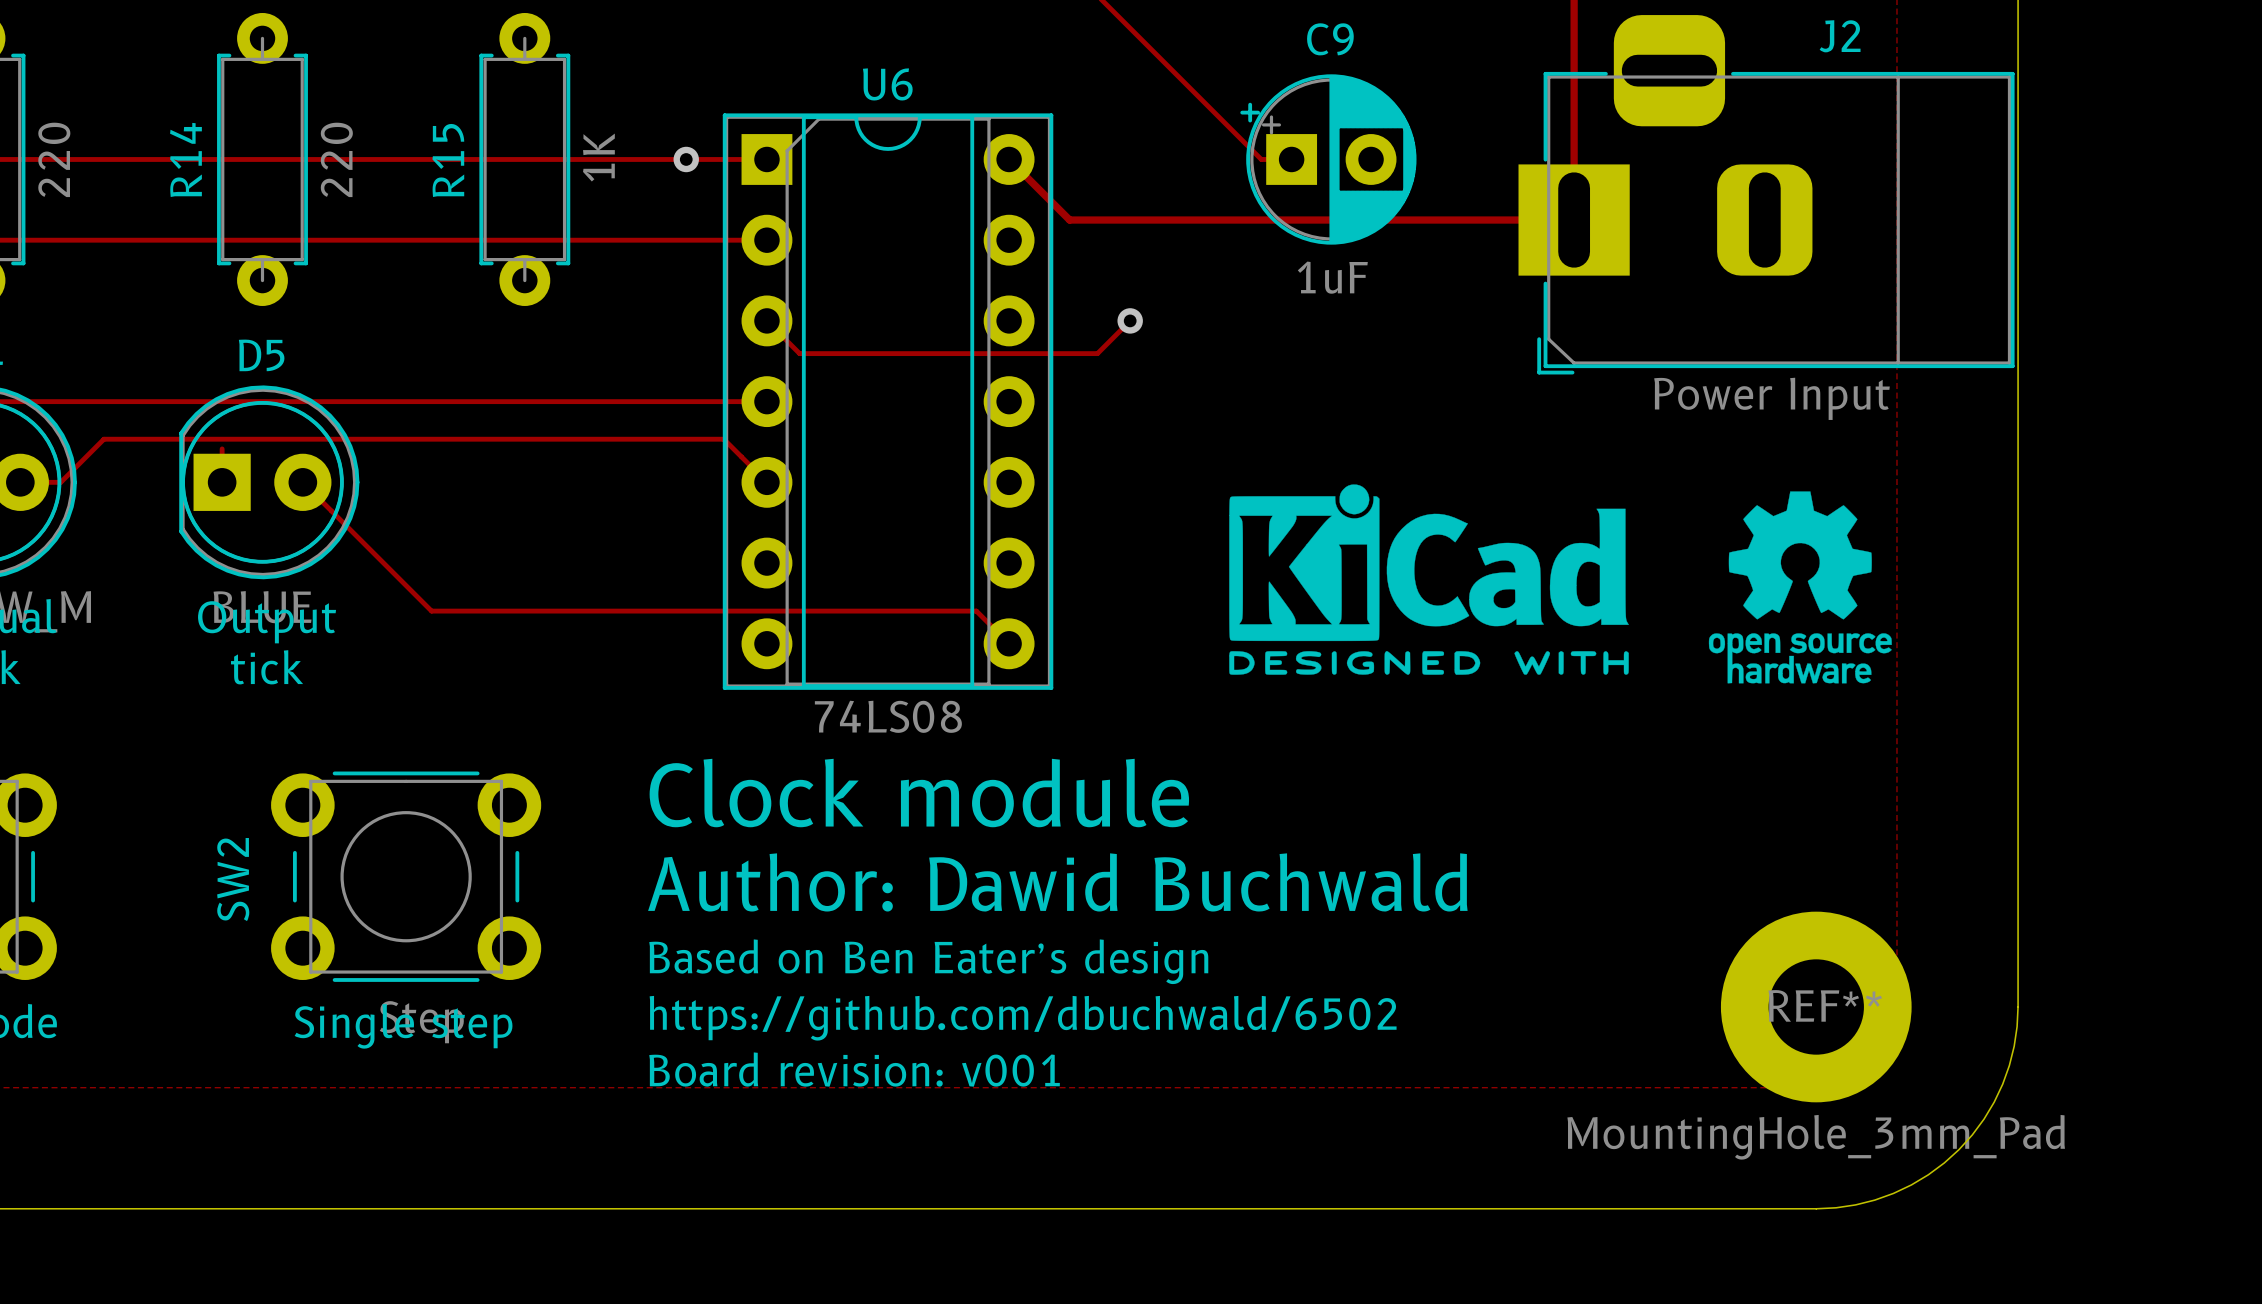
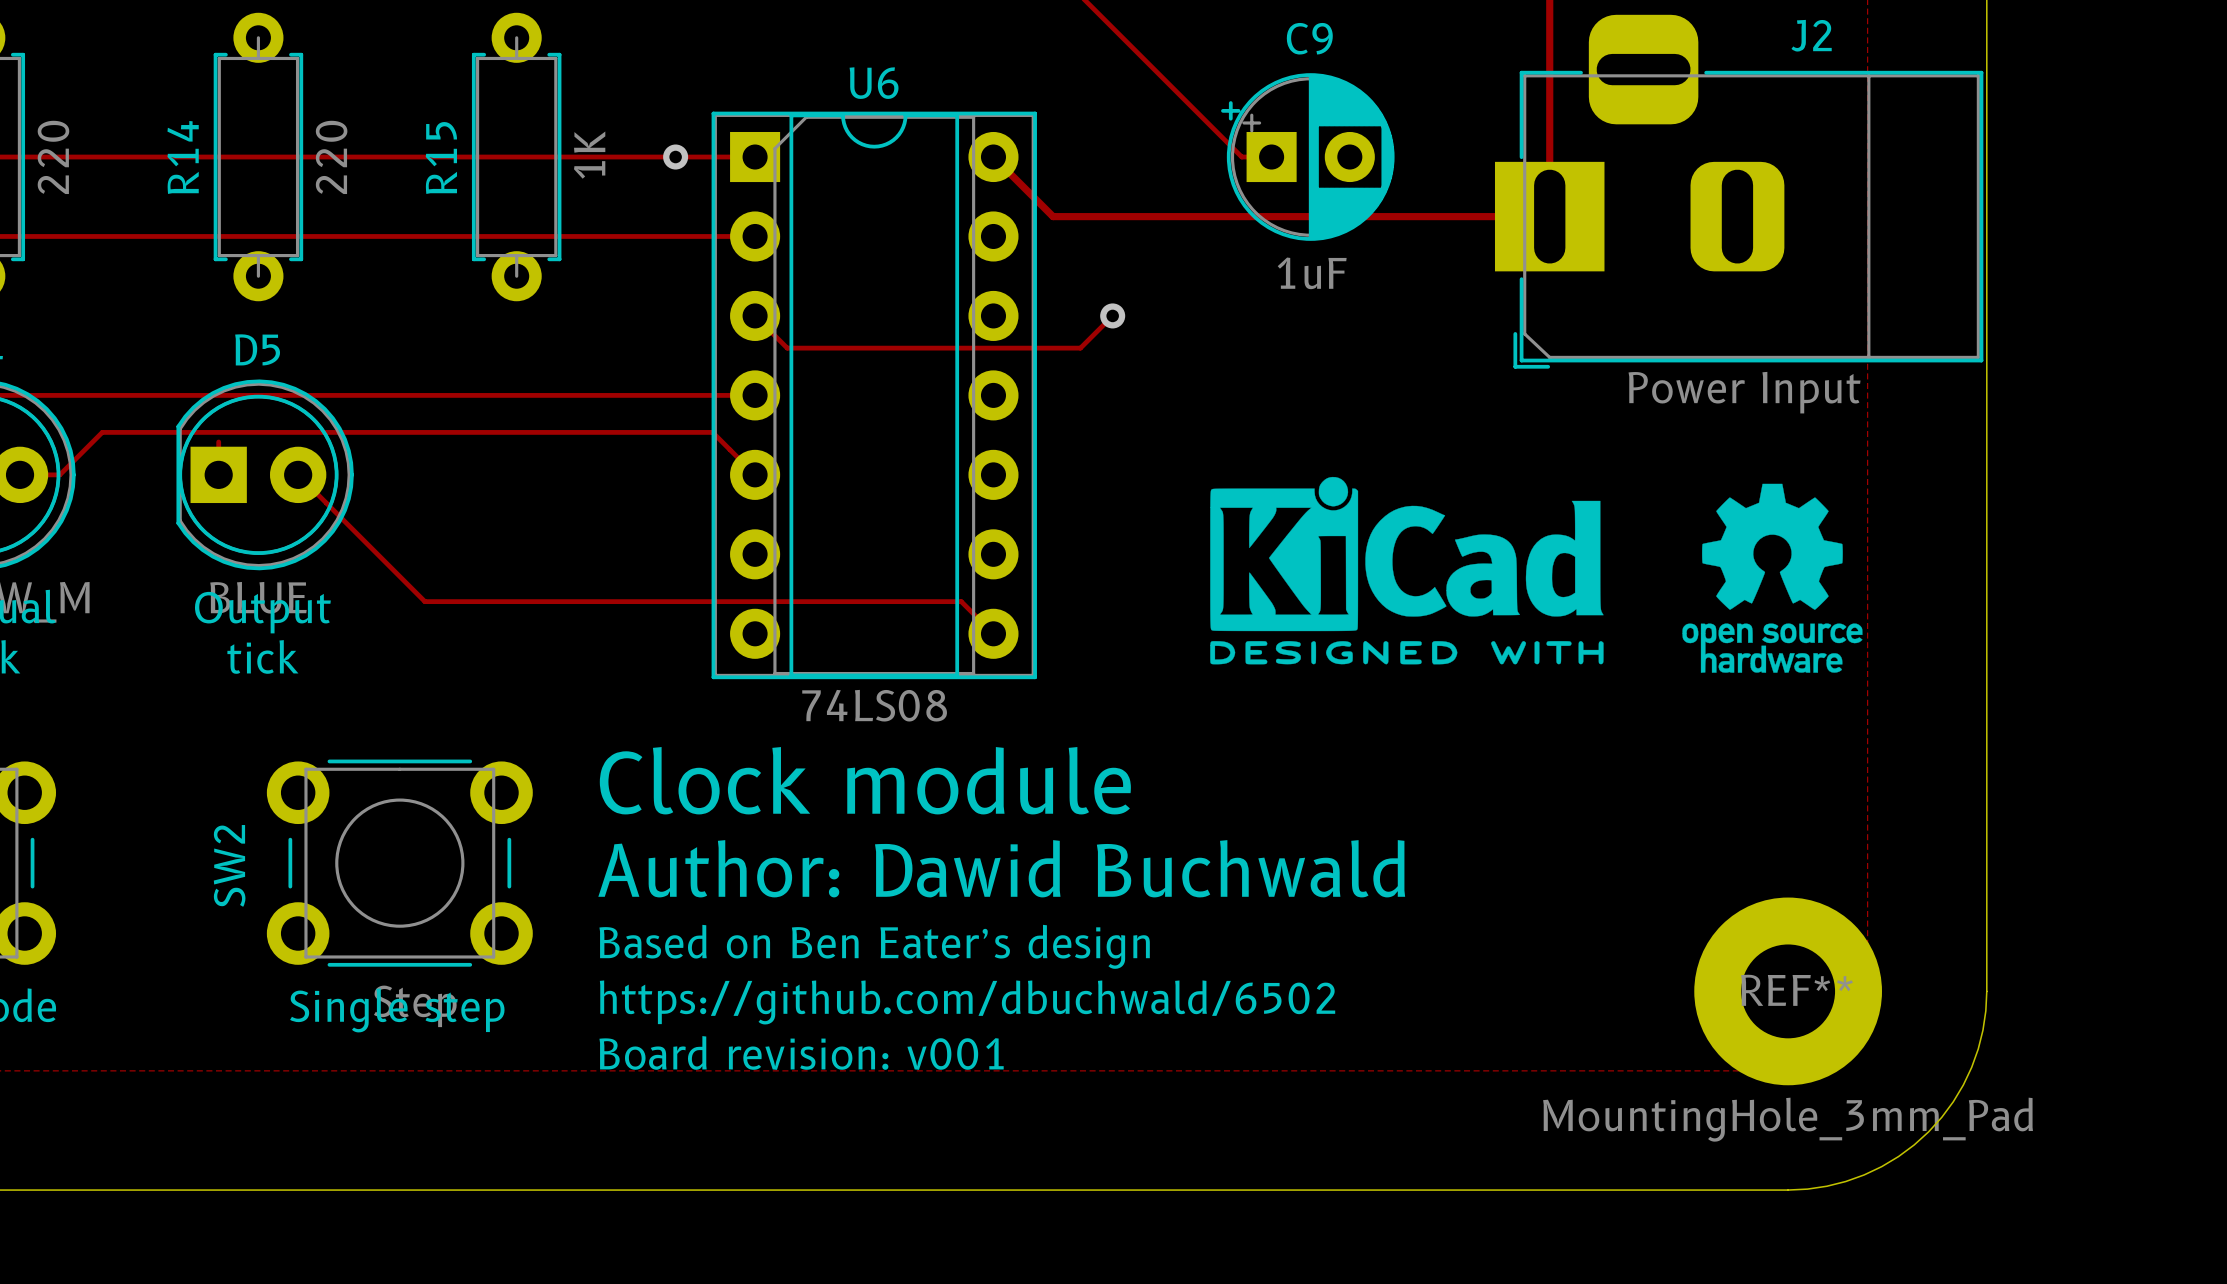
text position: Clock module (919, 793) -> Clock module (865, 780)
text position: Author: Dawid Buchwald (1057, 882) -> Author: Dawid Buchwald (1001, 868)
text position: Based on Ben Eater’s design (928, 961) -> Based on Ben Eater’s design (874, 946)
text position: https://github.com/dbuchwald/6502 (1023, 1018) -> https://github.com/dbuchwald/6502 (967, 1002)
text position: Board revision: v001 (854, 1069) -> Board revision: v001 (801, 1052)

